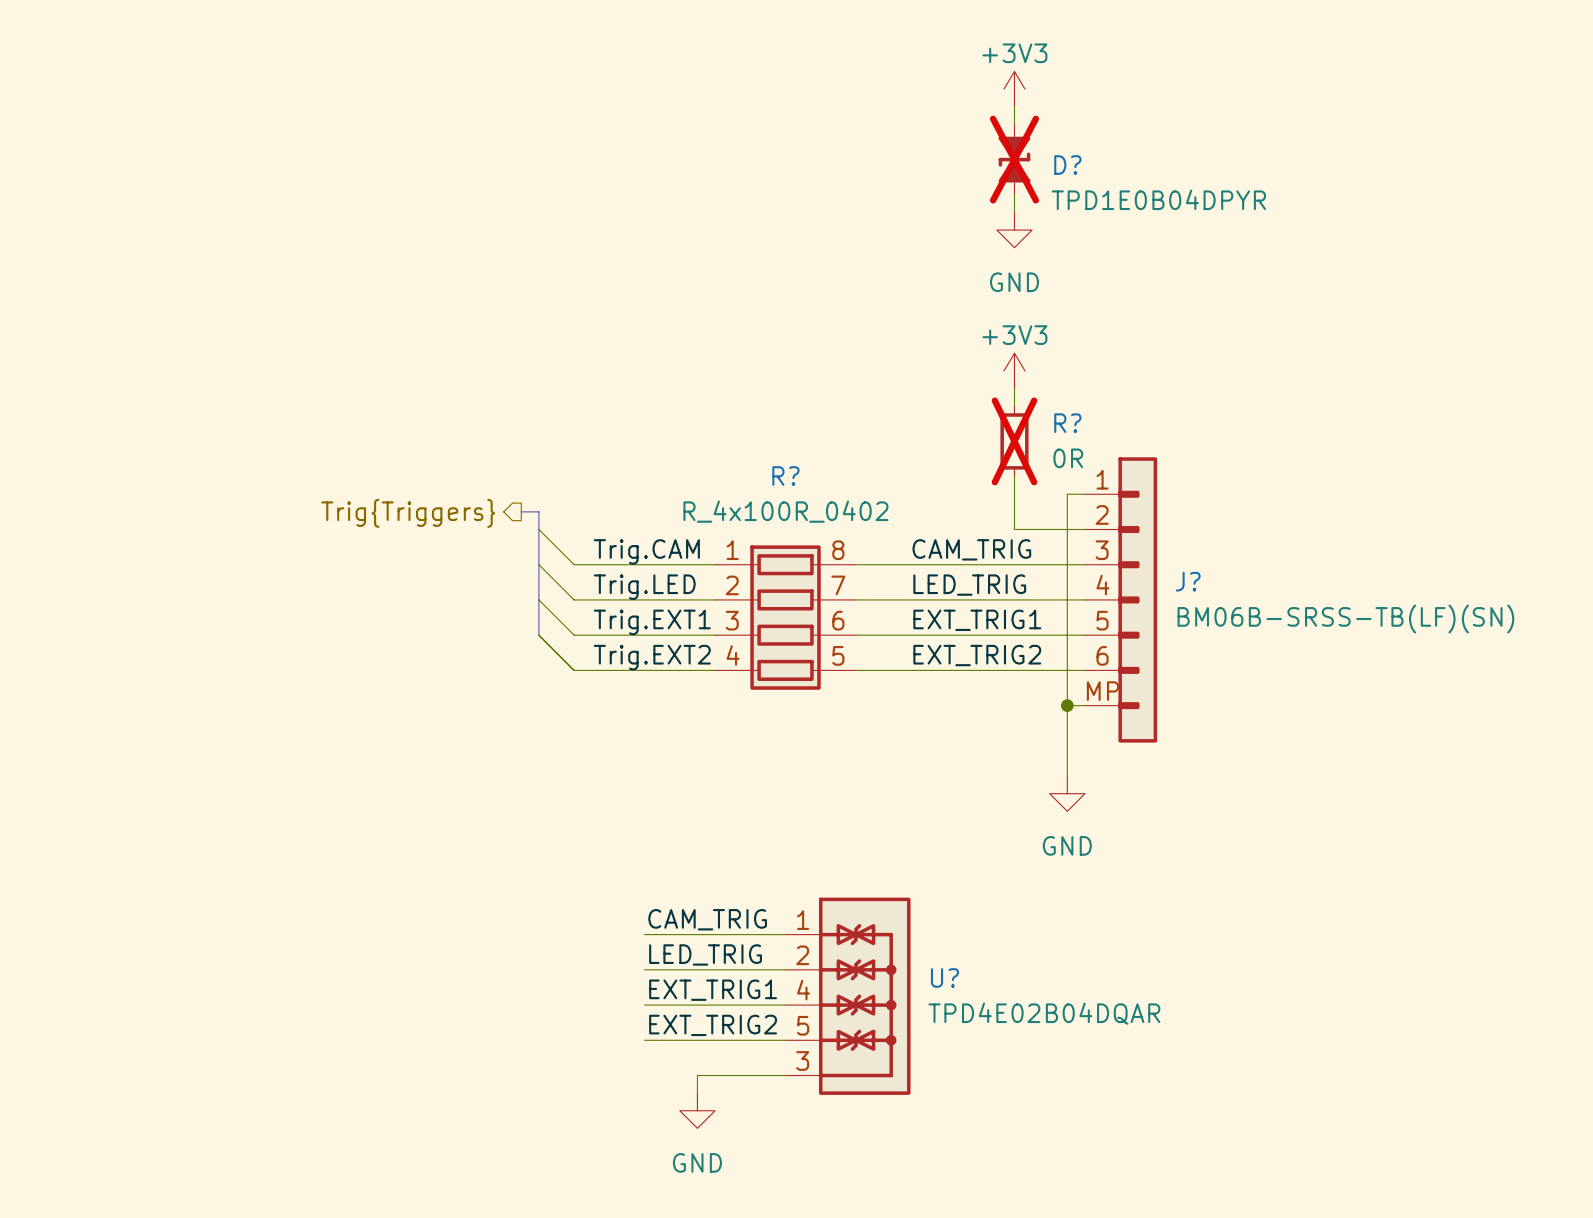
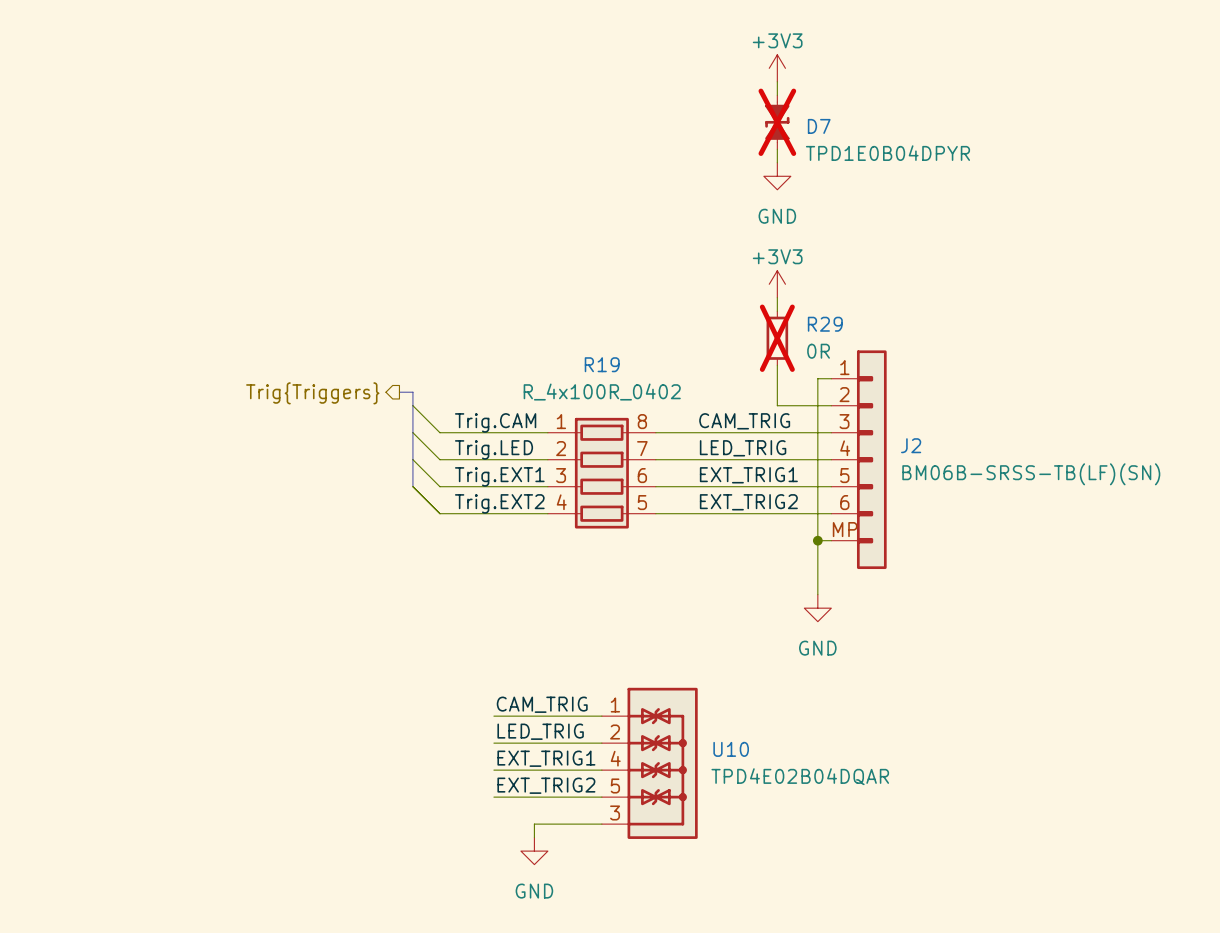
D? name: D? (1067, 165) -> D7 (819, 126)
R? name: R? (1067, 423) -> R29 (825, 324)
R? name: R? (785, 476) -> R19 (602, 364)
J? name: J? (1188, 581) -> J2 (911, 445)
U? name: U? (944, 977) -> U10 (731, 749)

